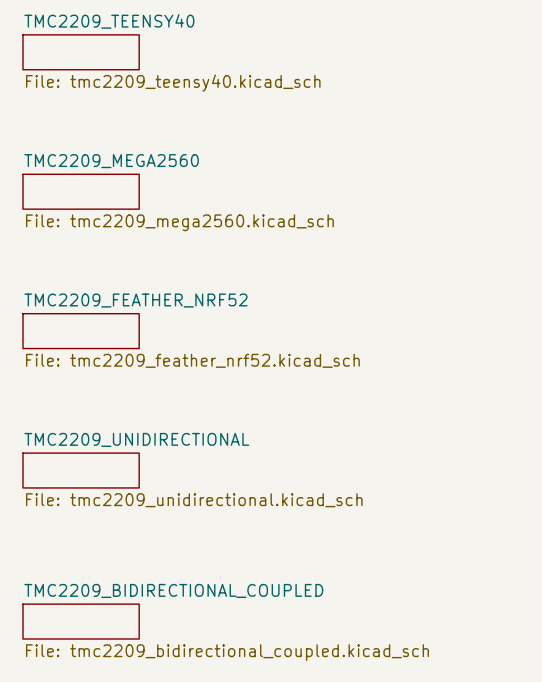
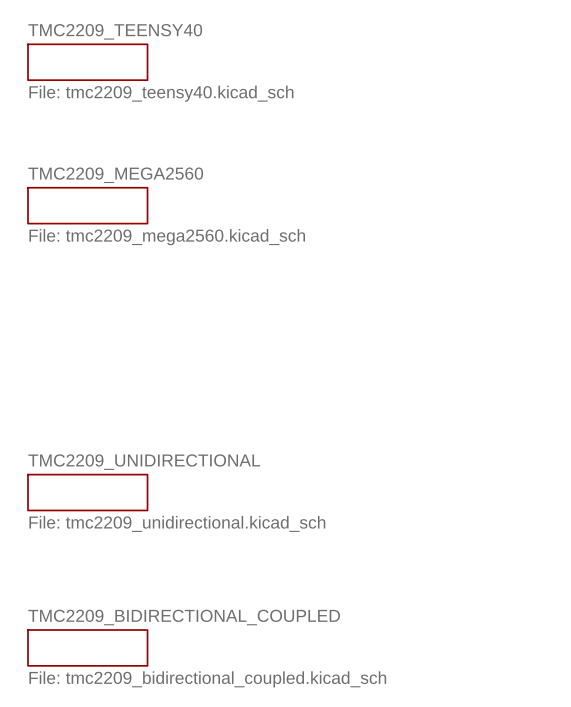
sheet TMC2209_FEATHER_NRF52: File: tmc2209_feather_nrf52.kicad_sch (81, 331) -> none

